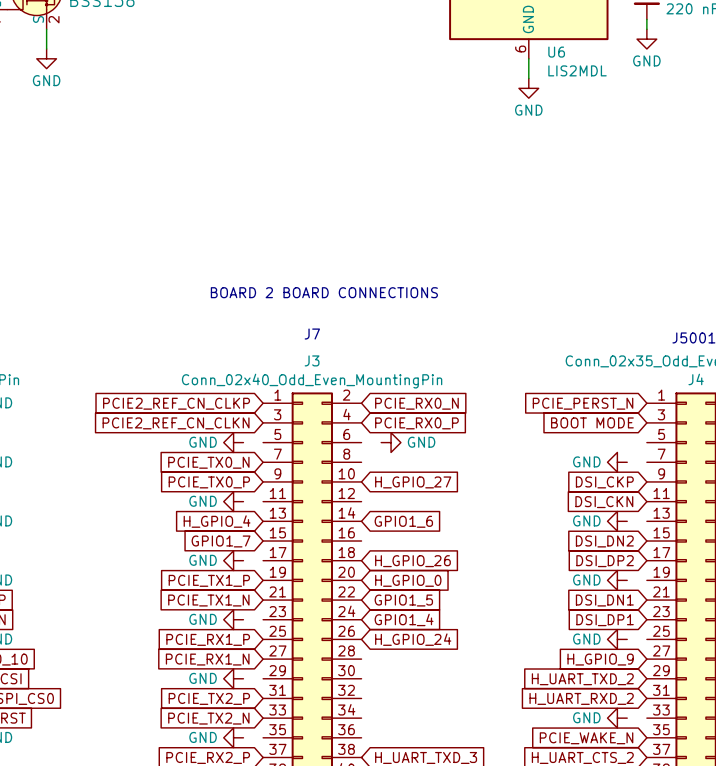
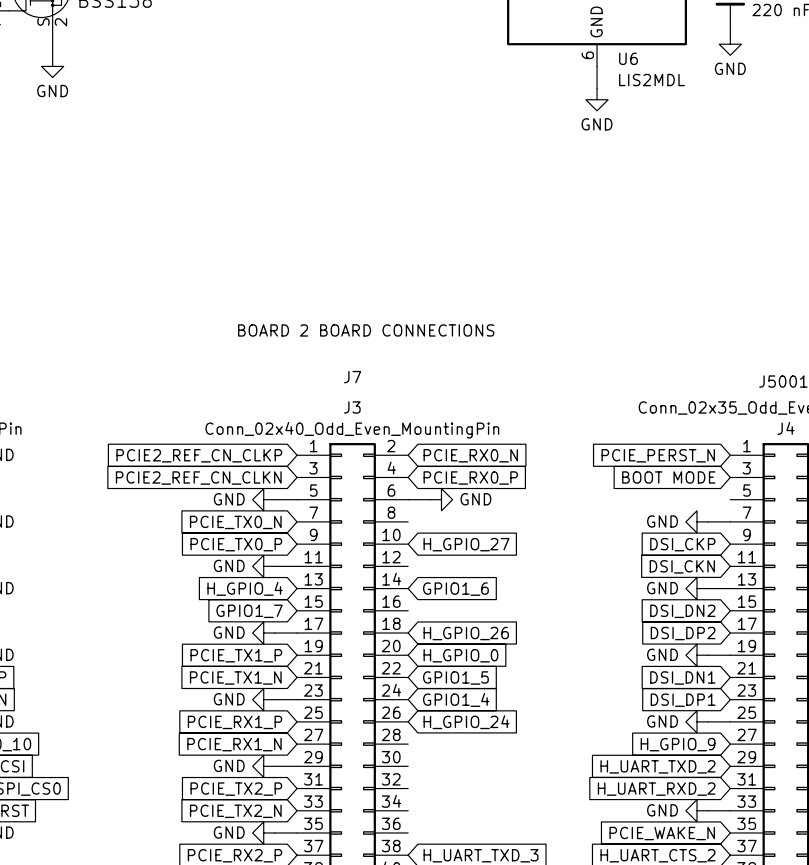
wire: none -> (274, 499) (297, 499)
wire: none -> (408, 499) (430, 499)
wire: none -> (708, 521) (730, 521)
wire: none -> (274, 566) (297, 566)
wire: none -> (708, 588) (730, 588)
wire: none -> (274, 633) (297, 633)
wire: none -> (708, 655) (730, 655)
wire: none -> (274, 699) (297, 699)
wire: none -> (708, 721) (730, 721)
wire: none -> (274, 766) (297, 766)
wire: none -> (708, 810) (730, 810)
wire: none -> (274, 832) (297, 832)

